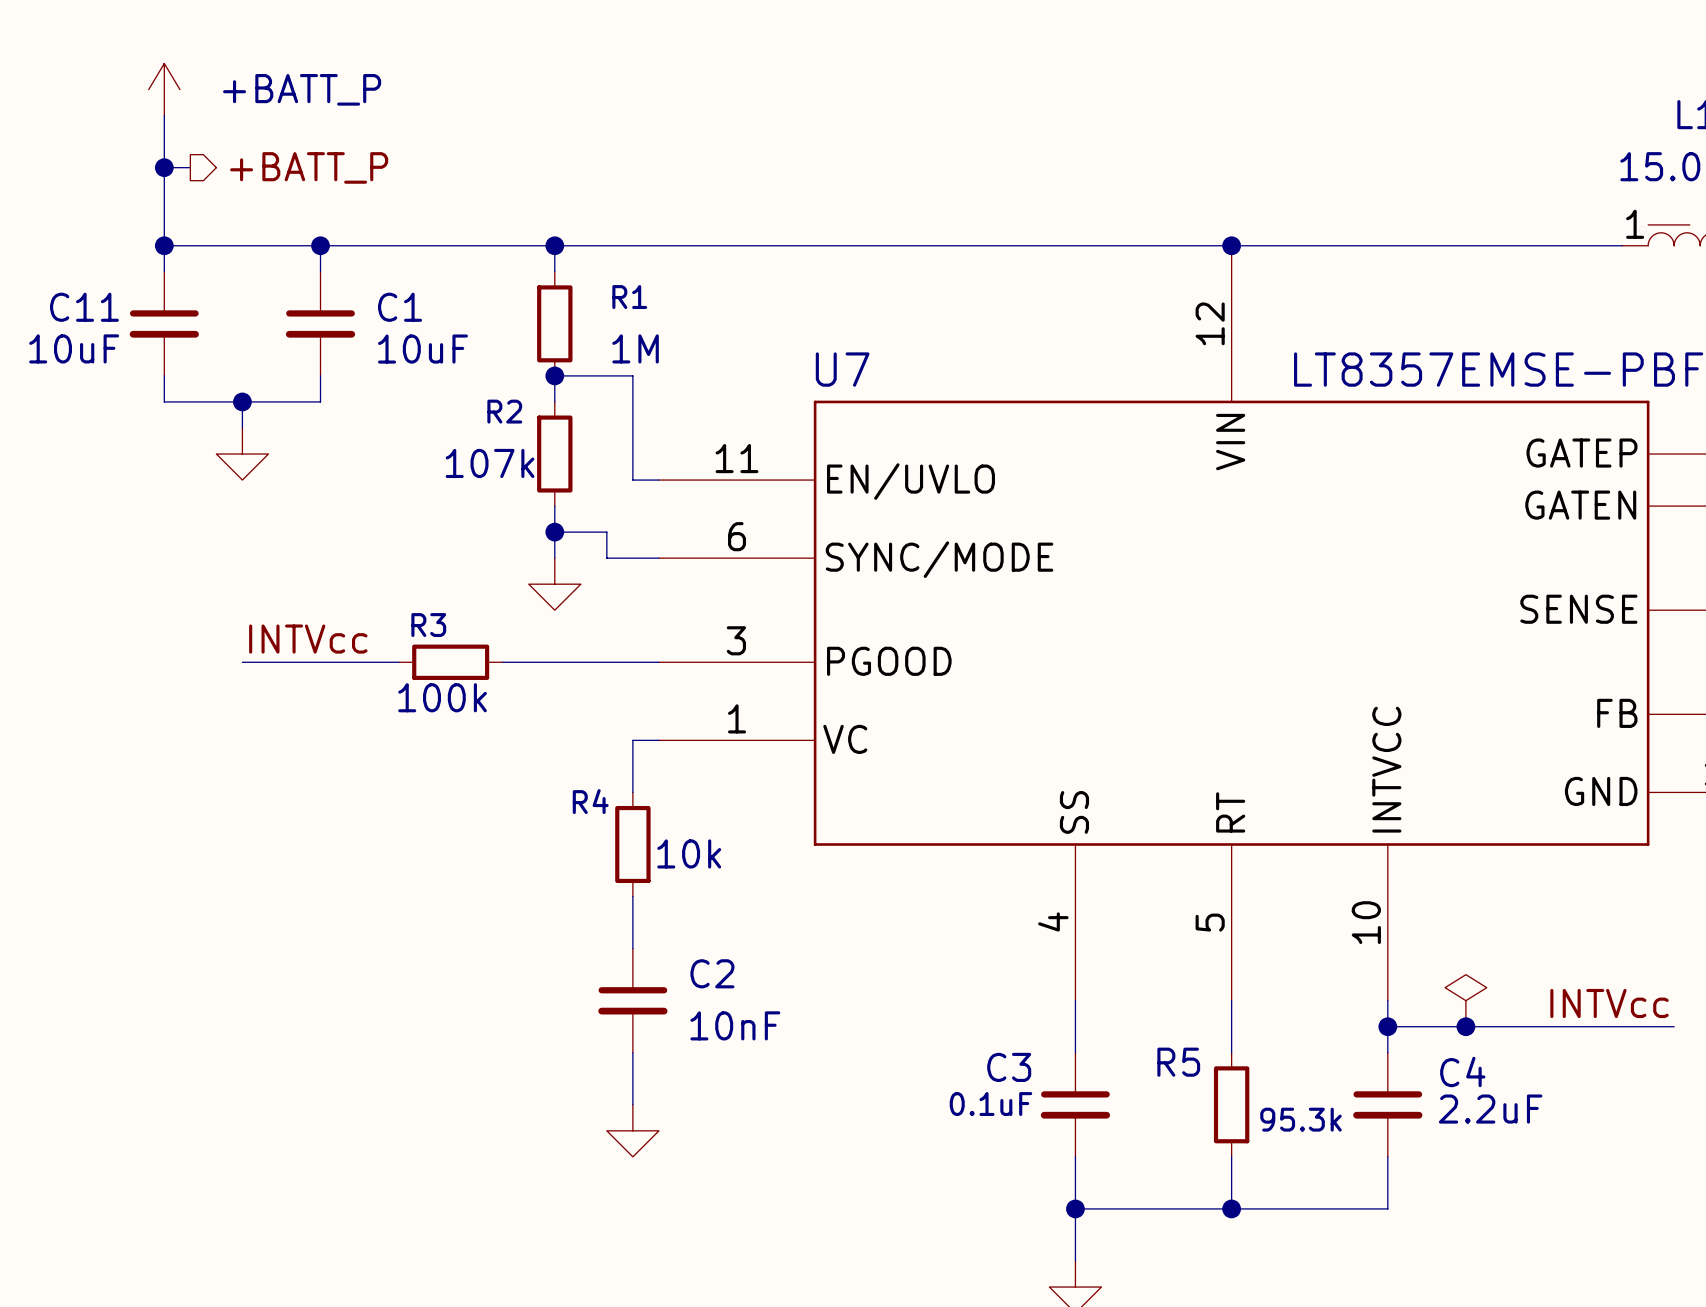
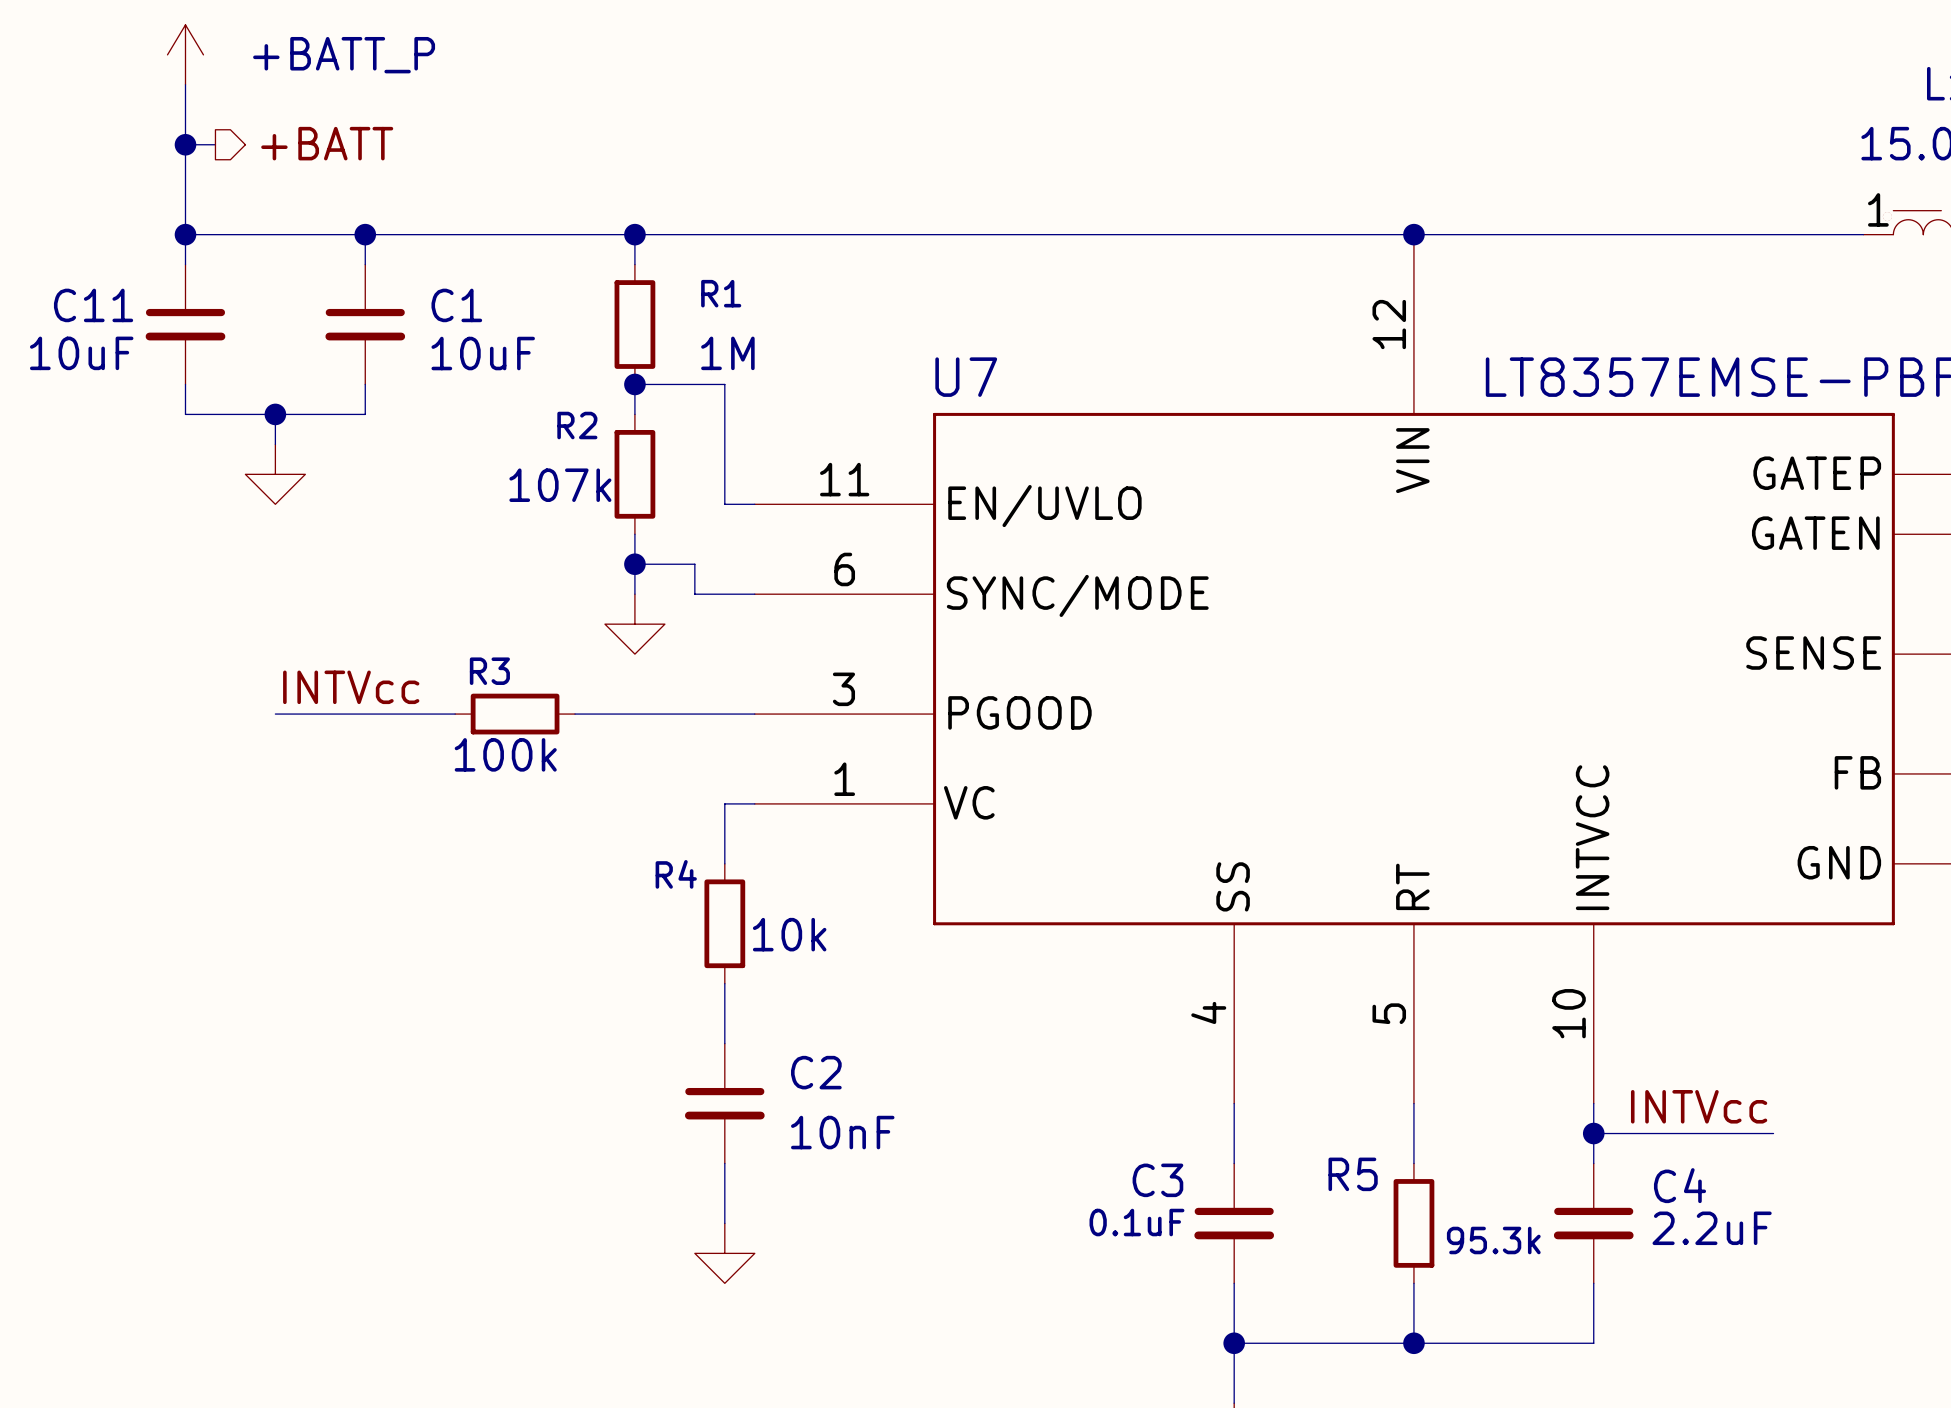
hierarchical label: +BATT_P (309, 167) -> +BATT (327, 143)
power symbol: (1465, 1000) -> none
label position: INTVcc (1609, 1003) -> INTVcc (1699, 1106)
junction: (1465, 1026) -> none
wire: (1544, 1026) (1674, 1026) -> none

